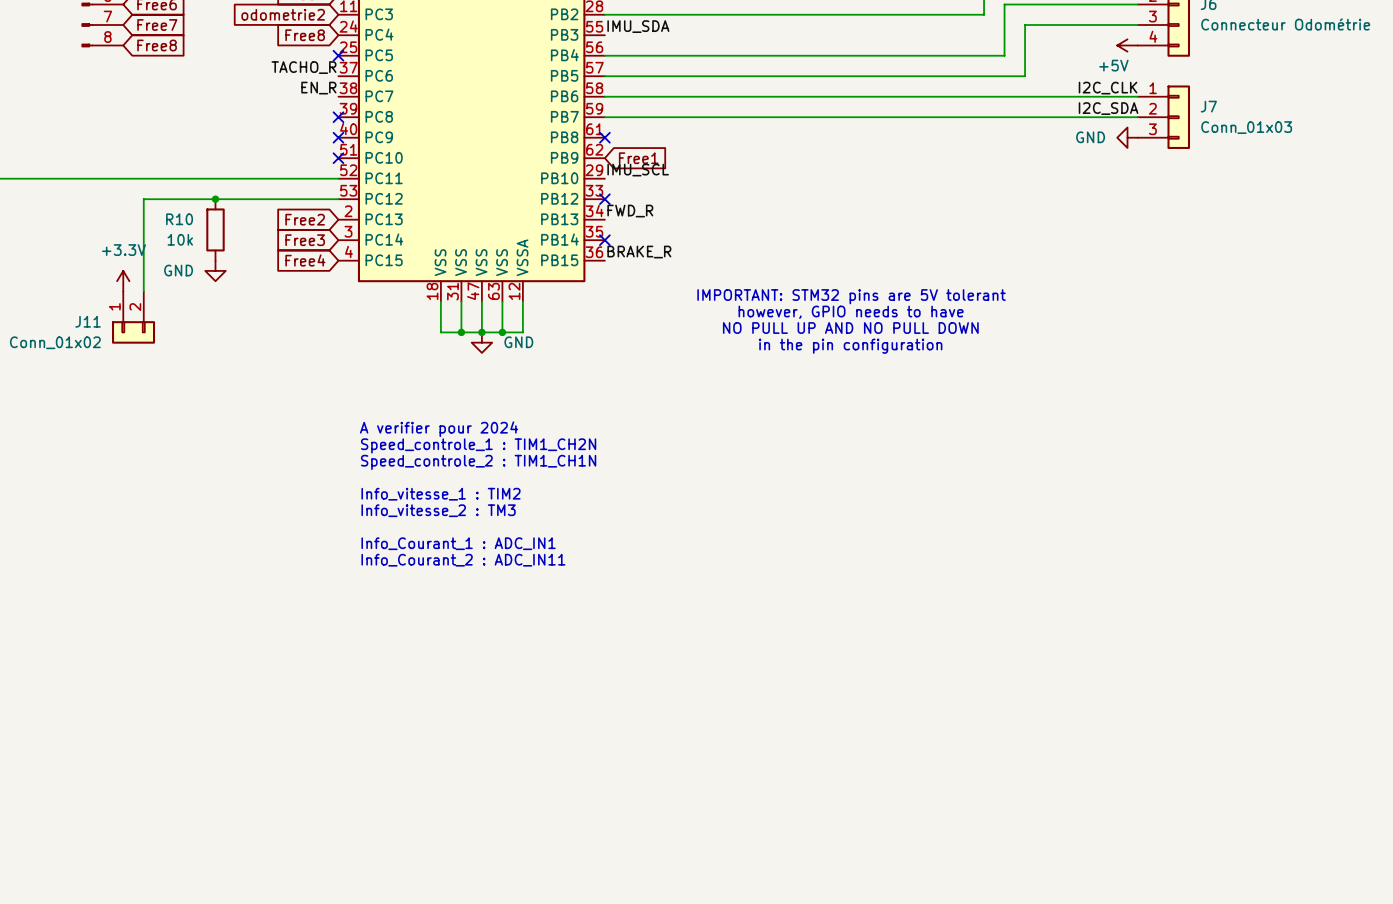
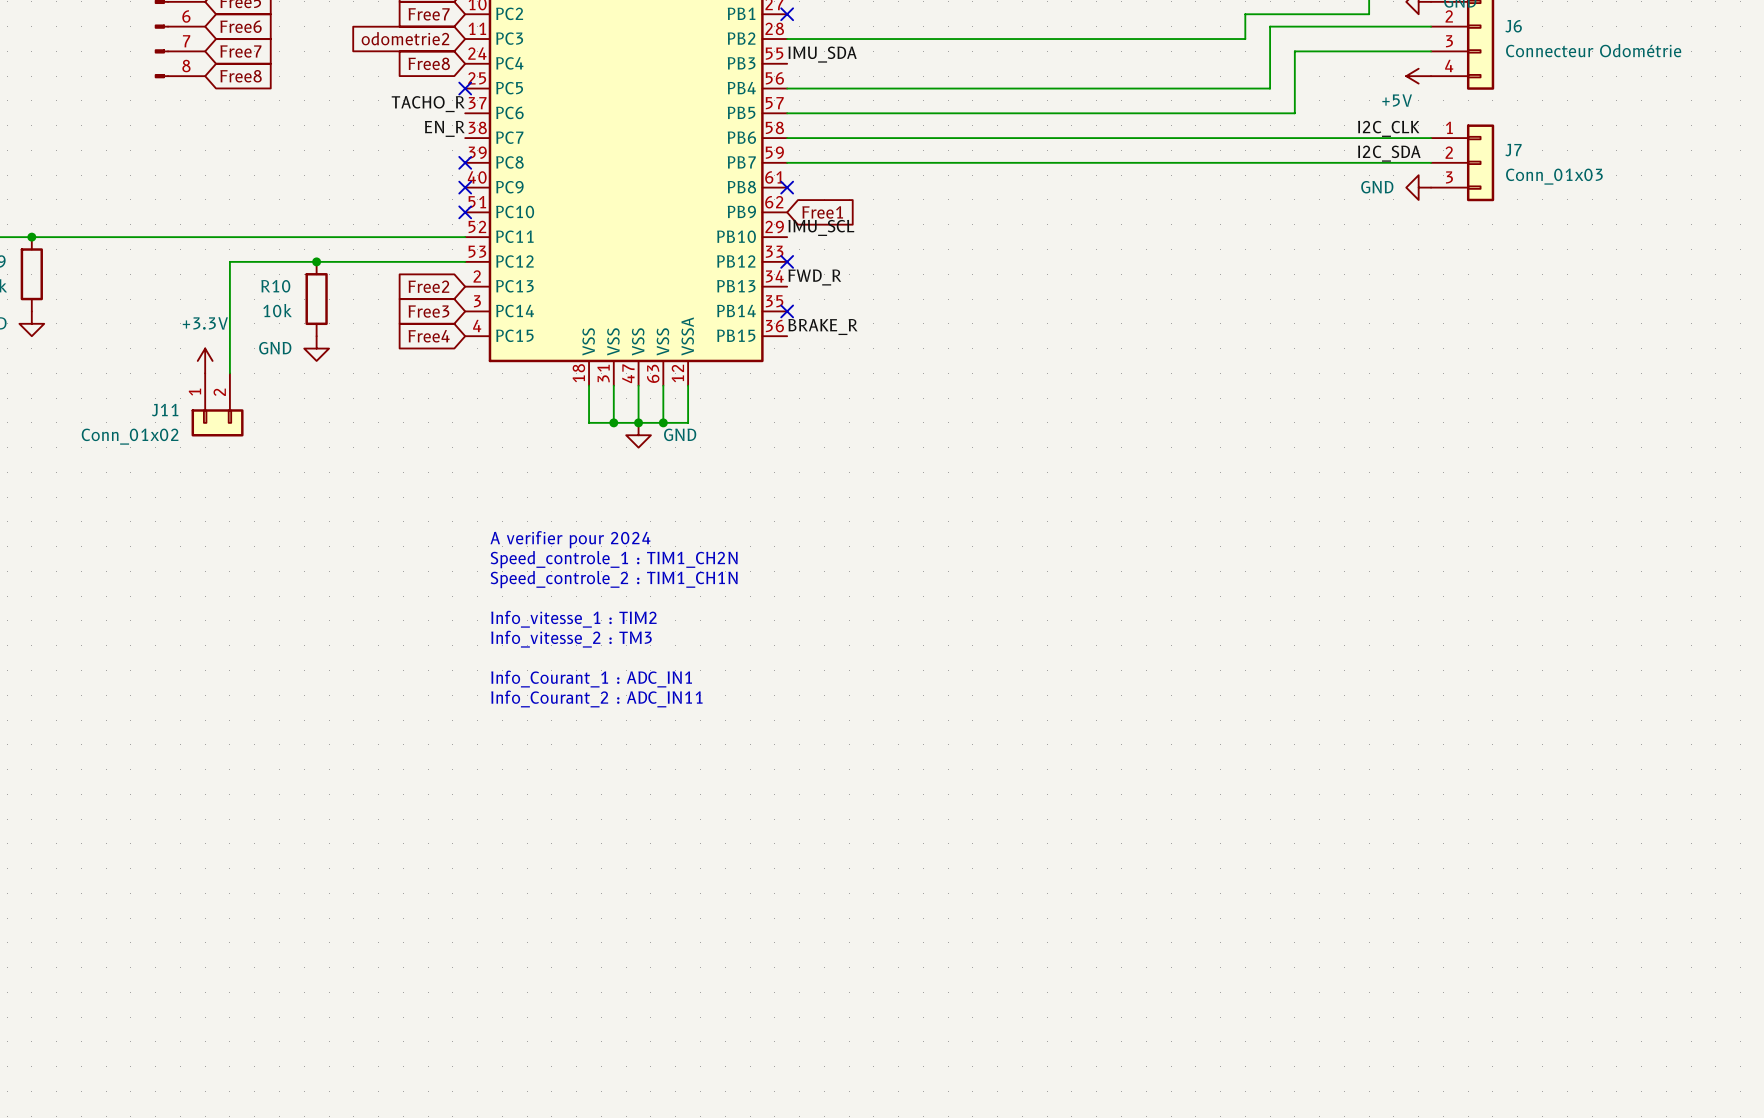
text: IMPORTANT: STM32 pins are 5V tolerant (851, 296) -> none
text: however, GPIO needs to have (851, 312) -> none
text: NO PULL UP AND NO PULL DOWN (850, 328) -> none
text: in the pin configuration (850, 346) -> none

